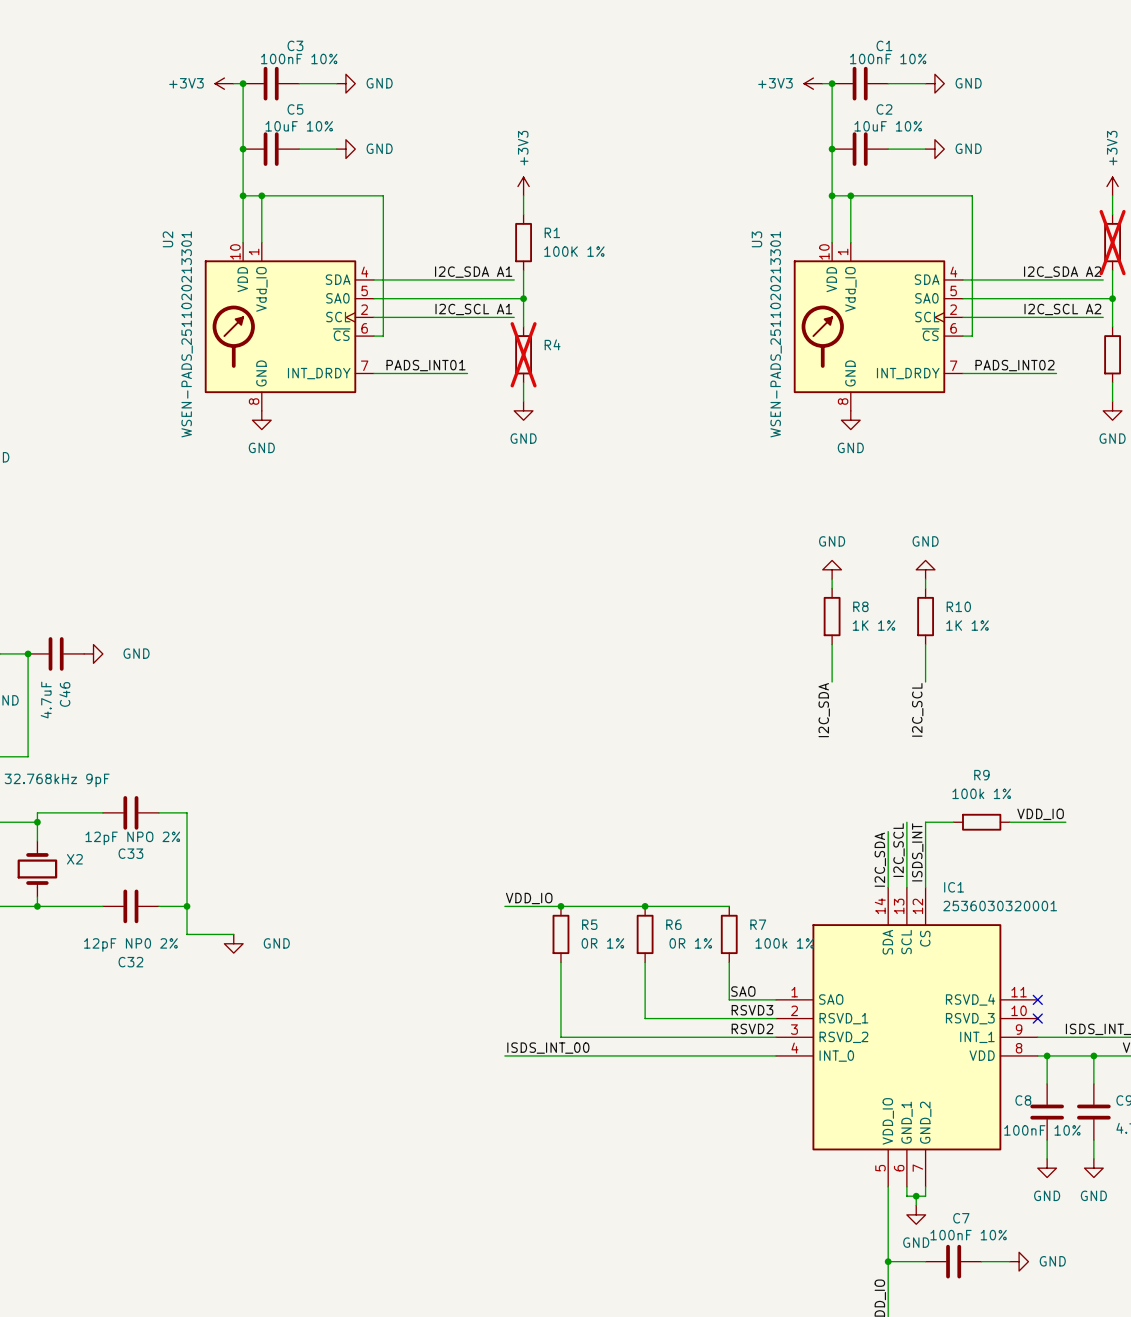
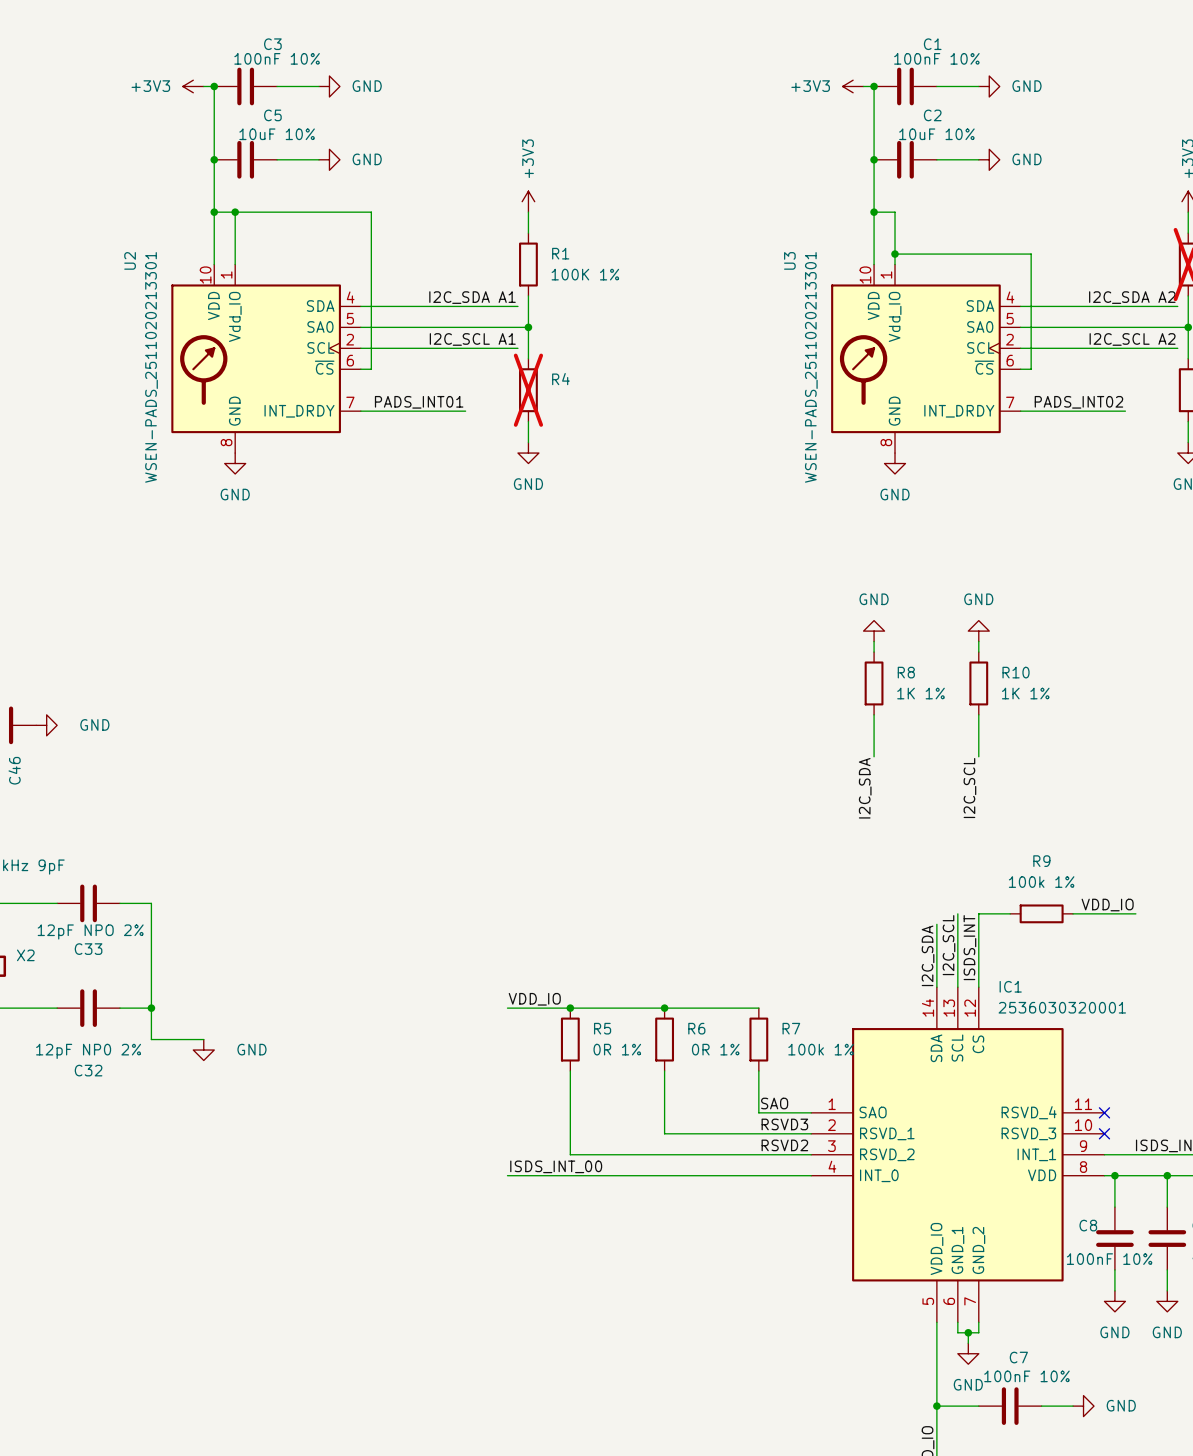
wire: (850, 195) (972, 195) (972, 233) -> (895, 254) (1031, 254)
junction position: (850, 195) -> (895, 254)

